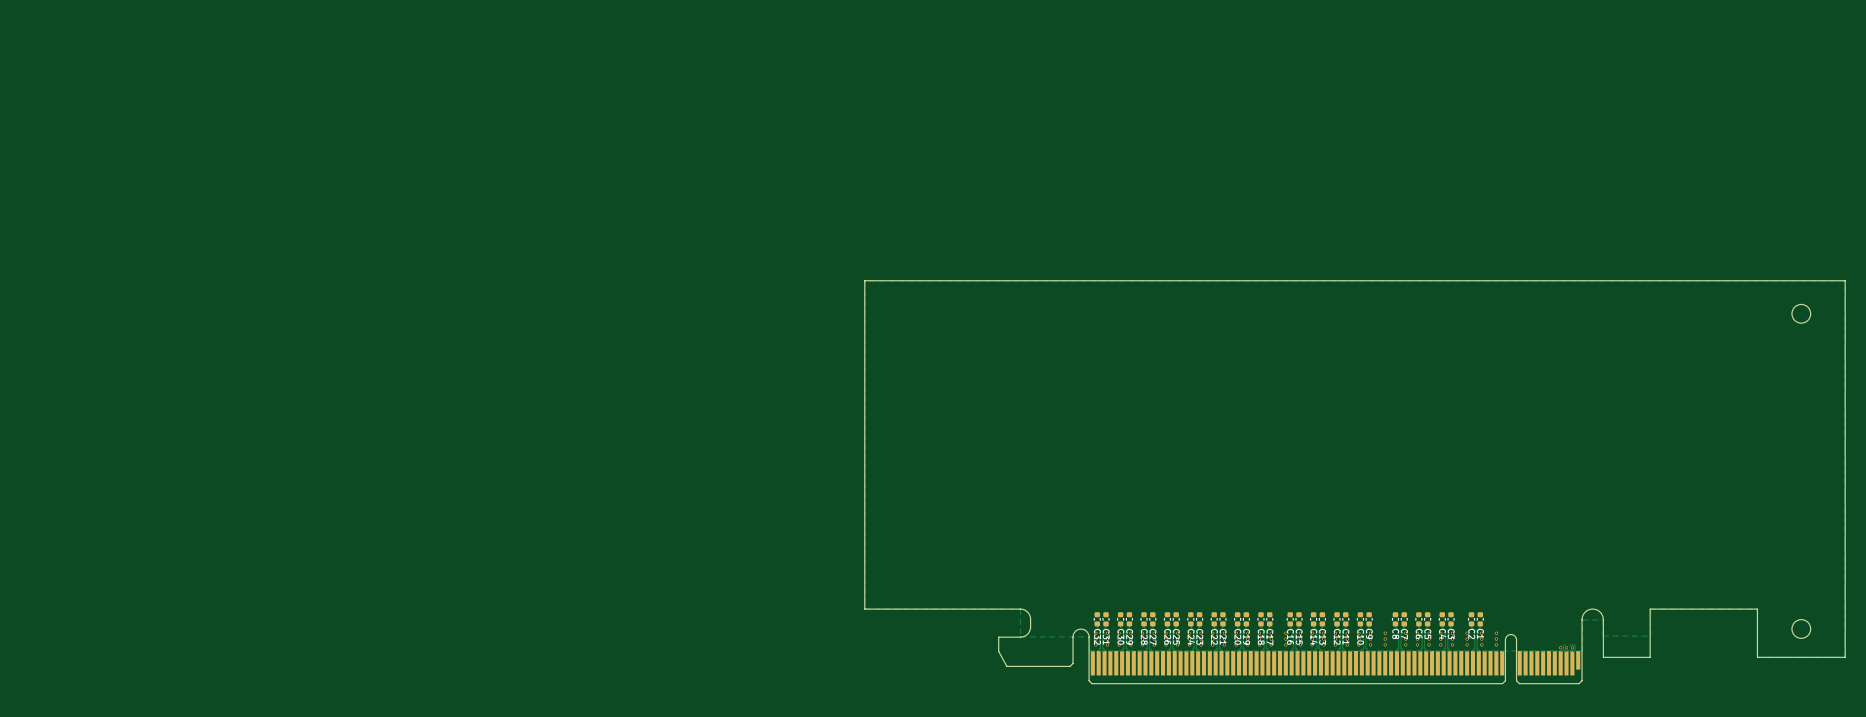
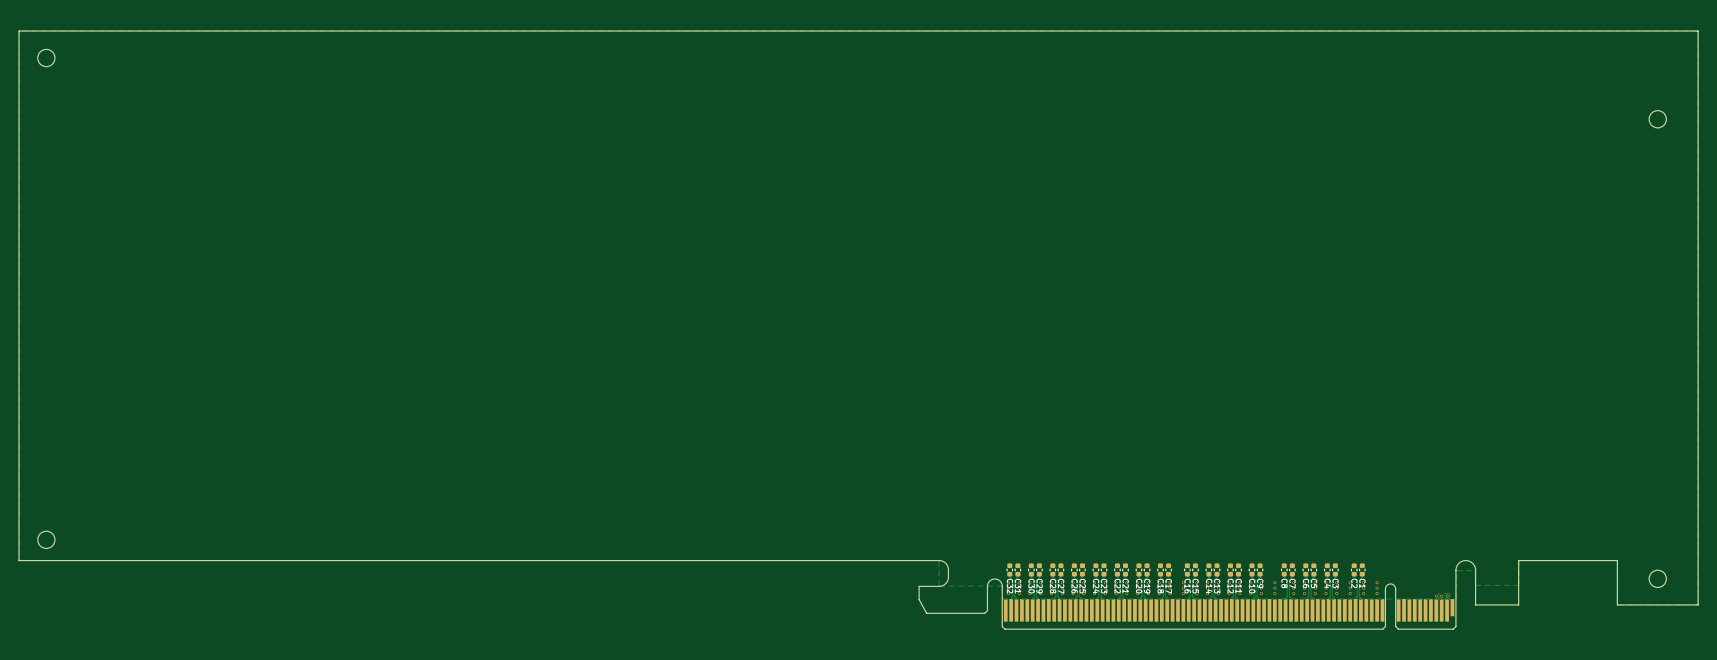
round board edge: none -> [37, 49, 56, 68]
round board edge: none -> [1648, 110, 1667, 129]
board edge: (1845, 280) (864, 280) (864, 609) -> (1698, 258) (1698, 31) (19, 31) (19, 560) (795, 560)
round board edge: [1791, 303, 1812, 324] -> none
round board edge: none -> [37, 530, 56, 549]

